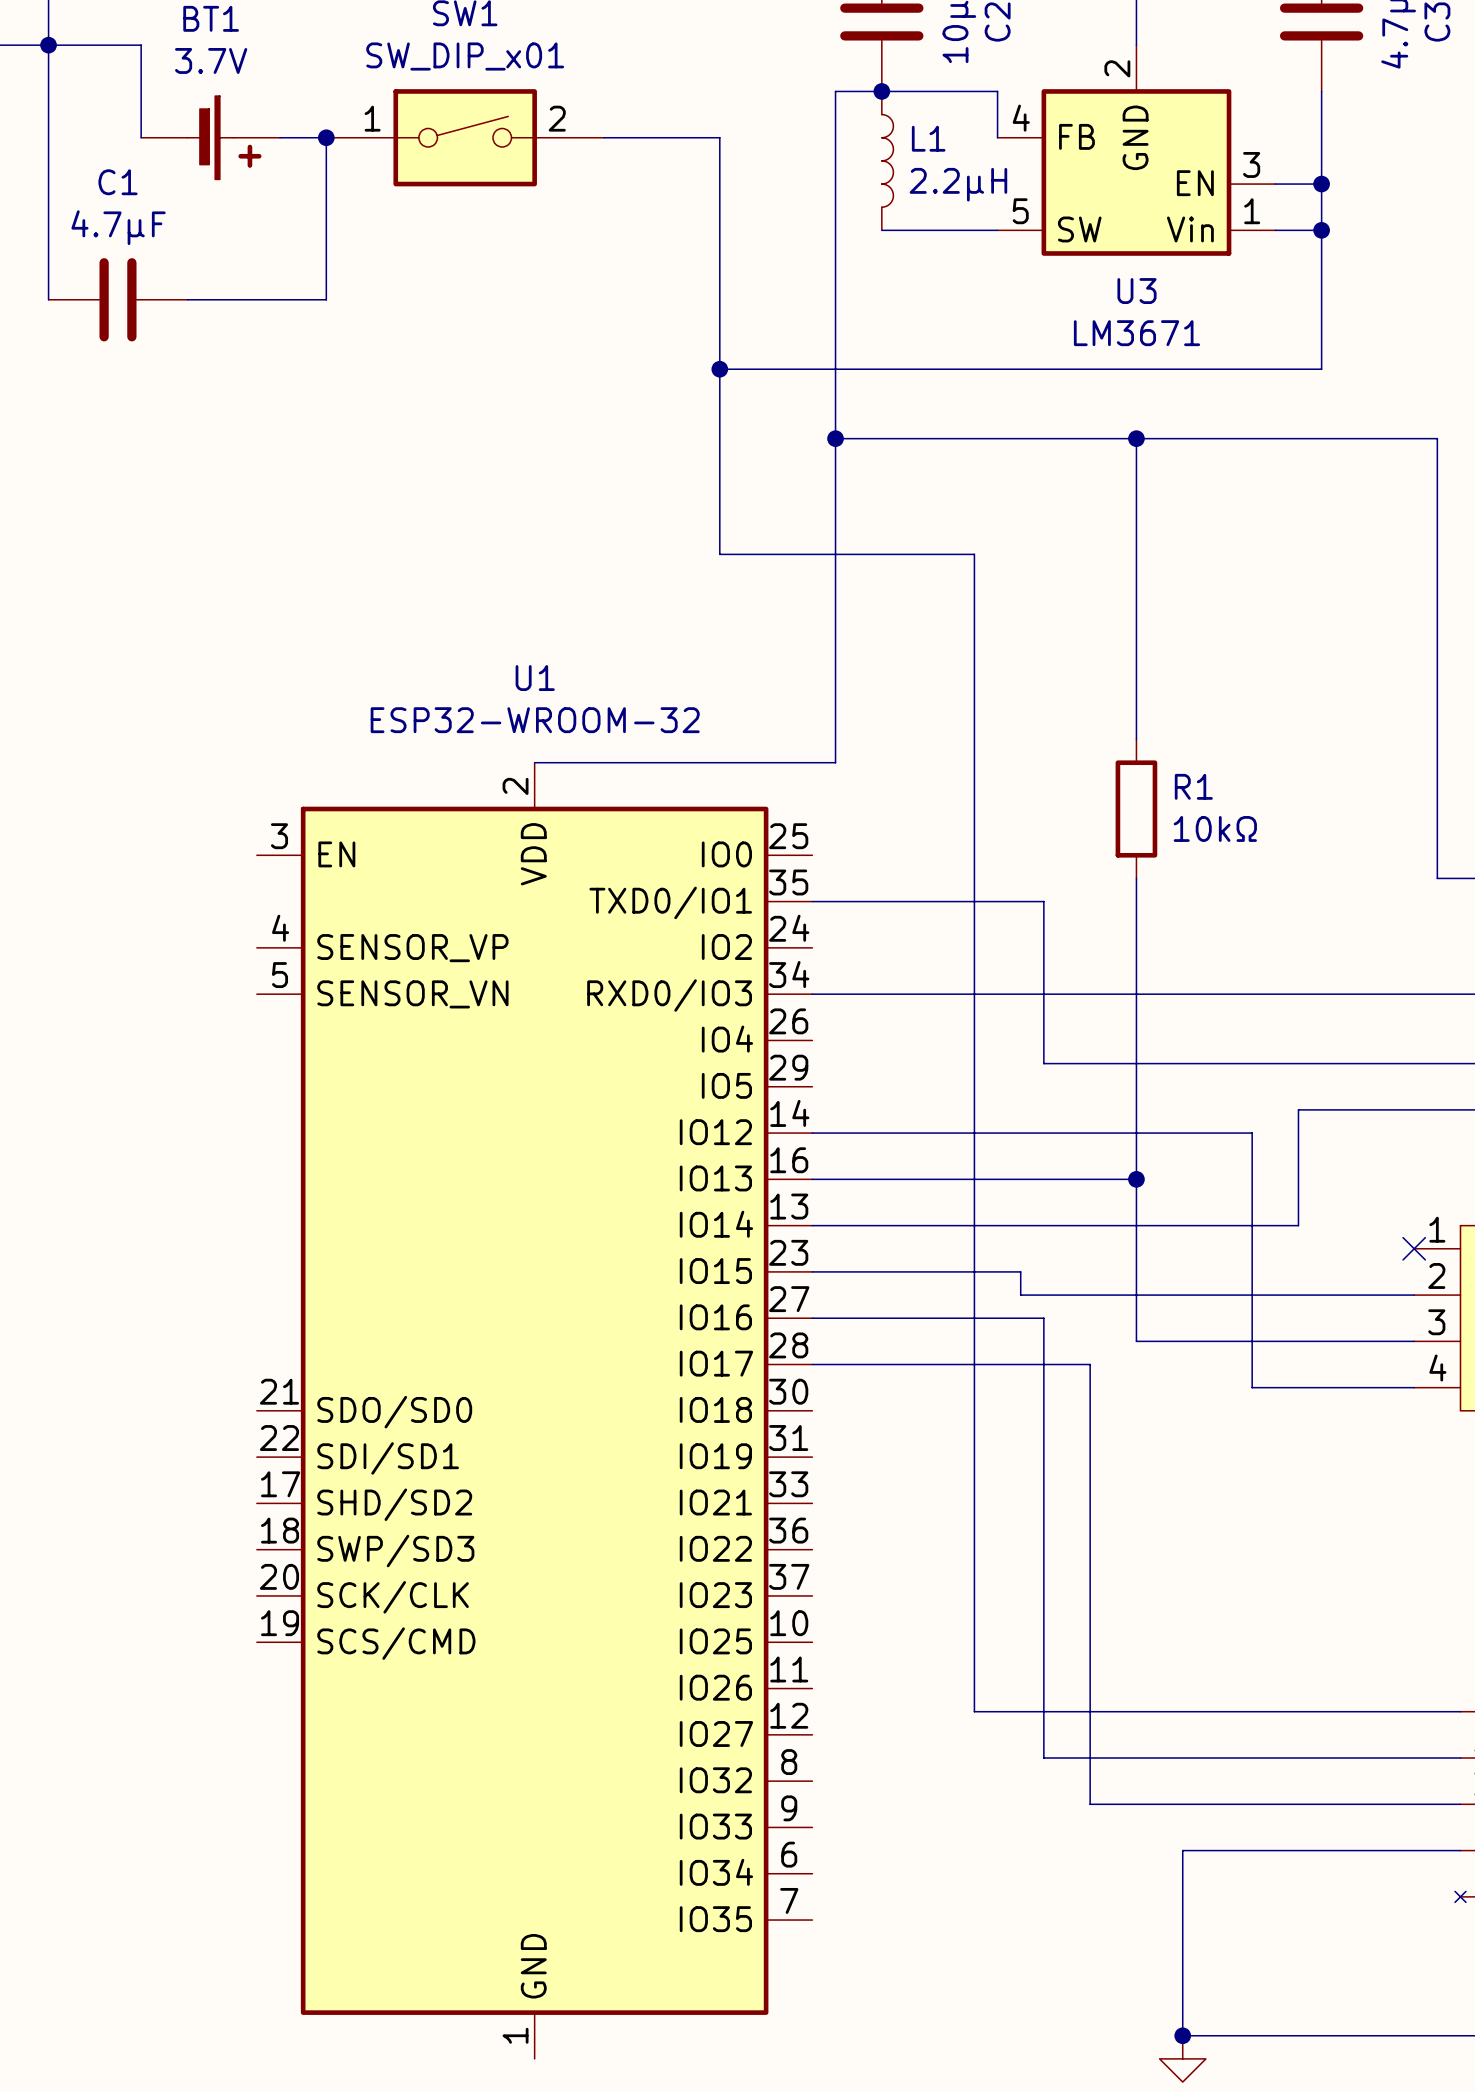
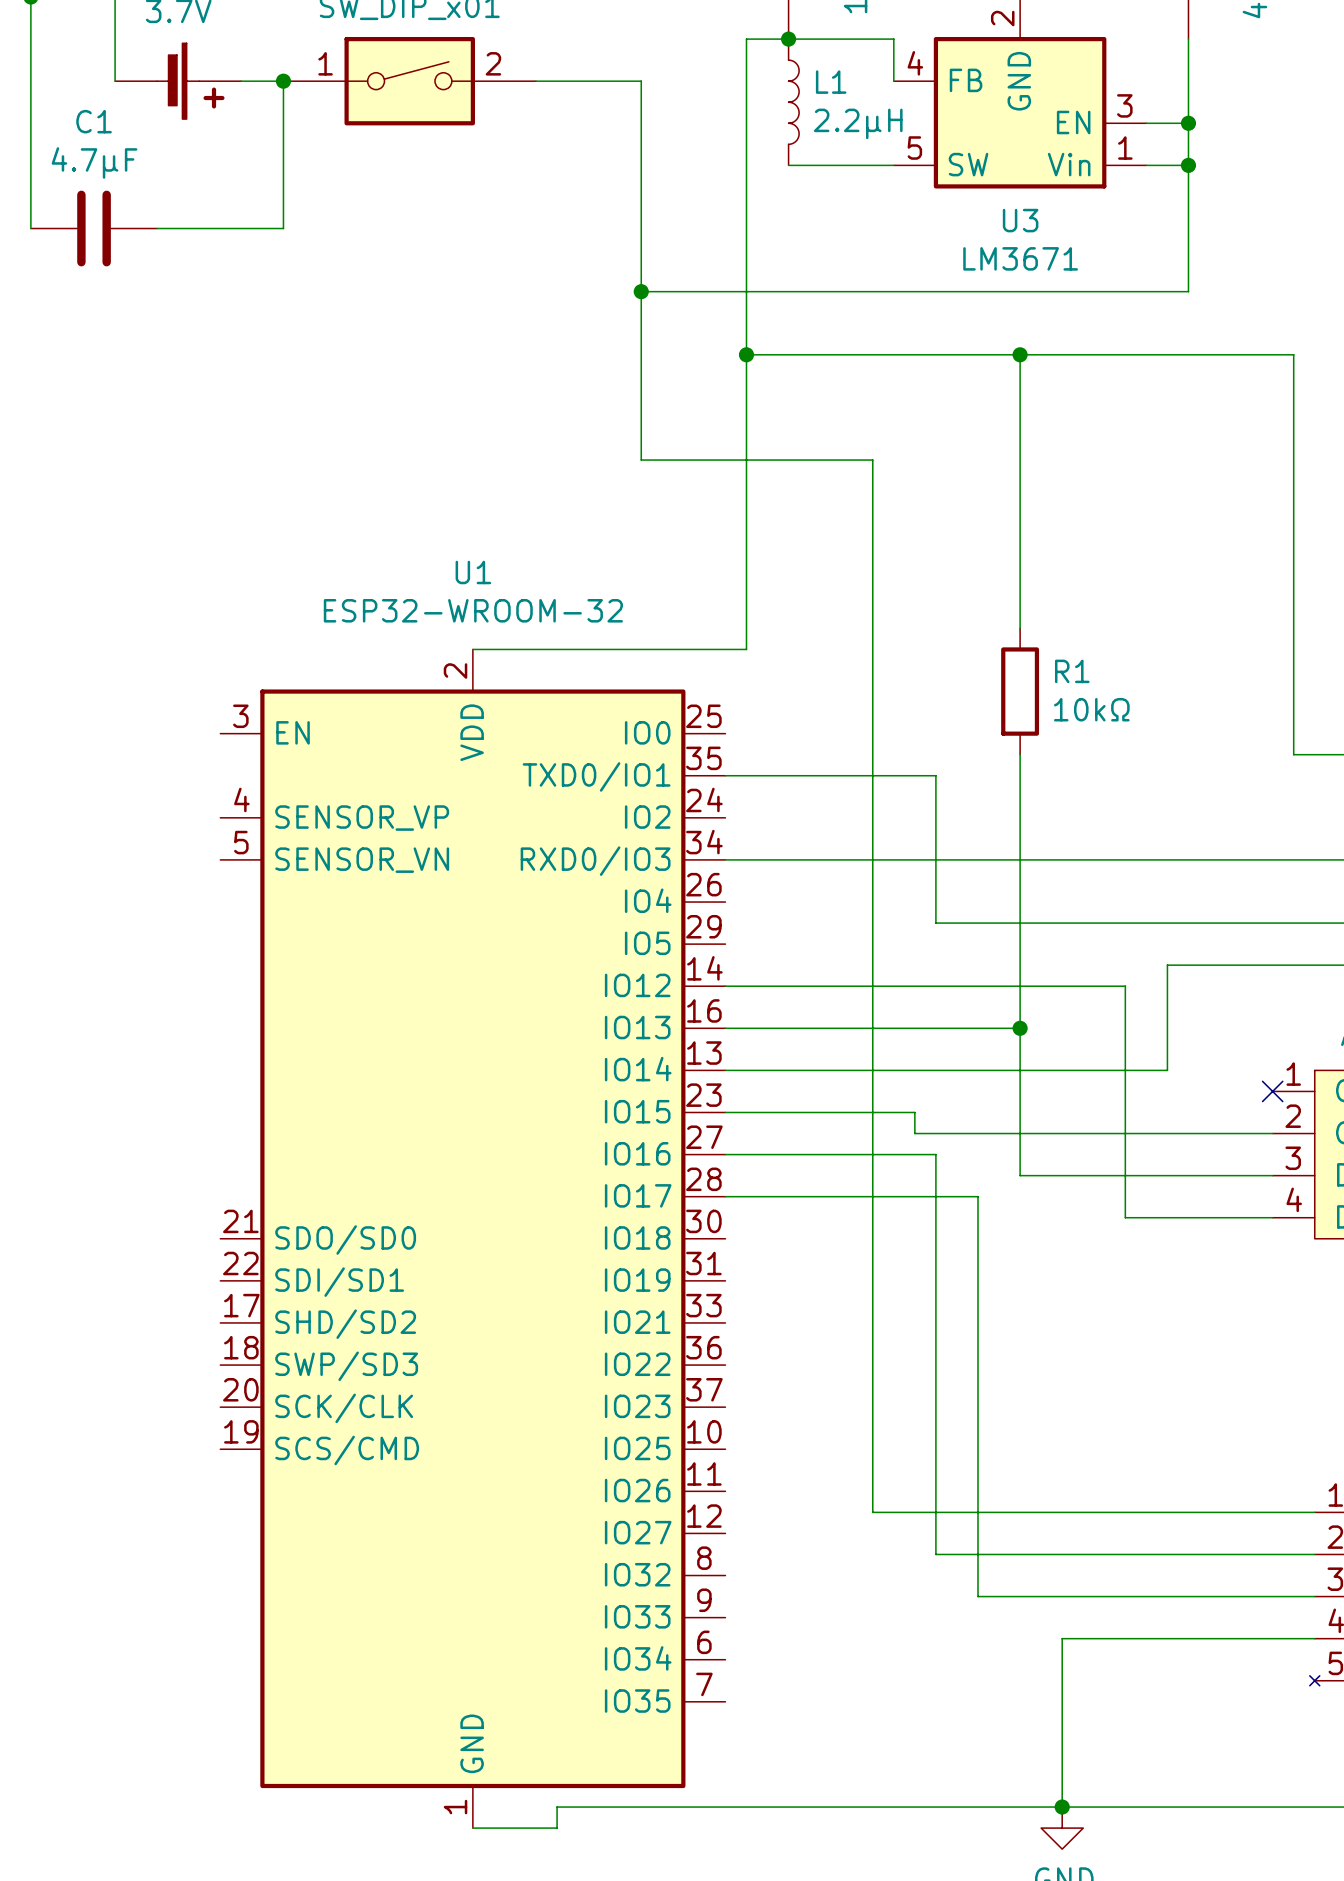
wire: none -> (1062, 1807) (557, 1807) (557, 1828) (472, 1828)

